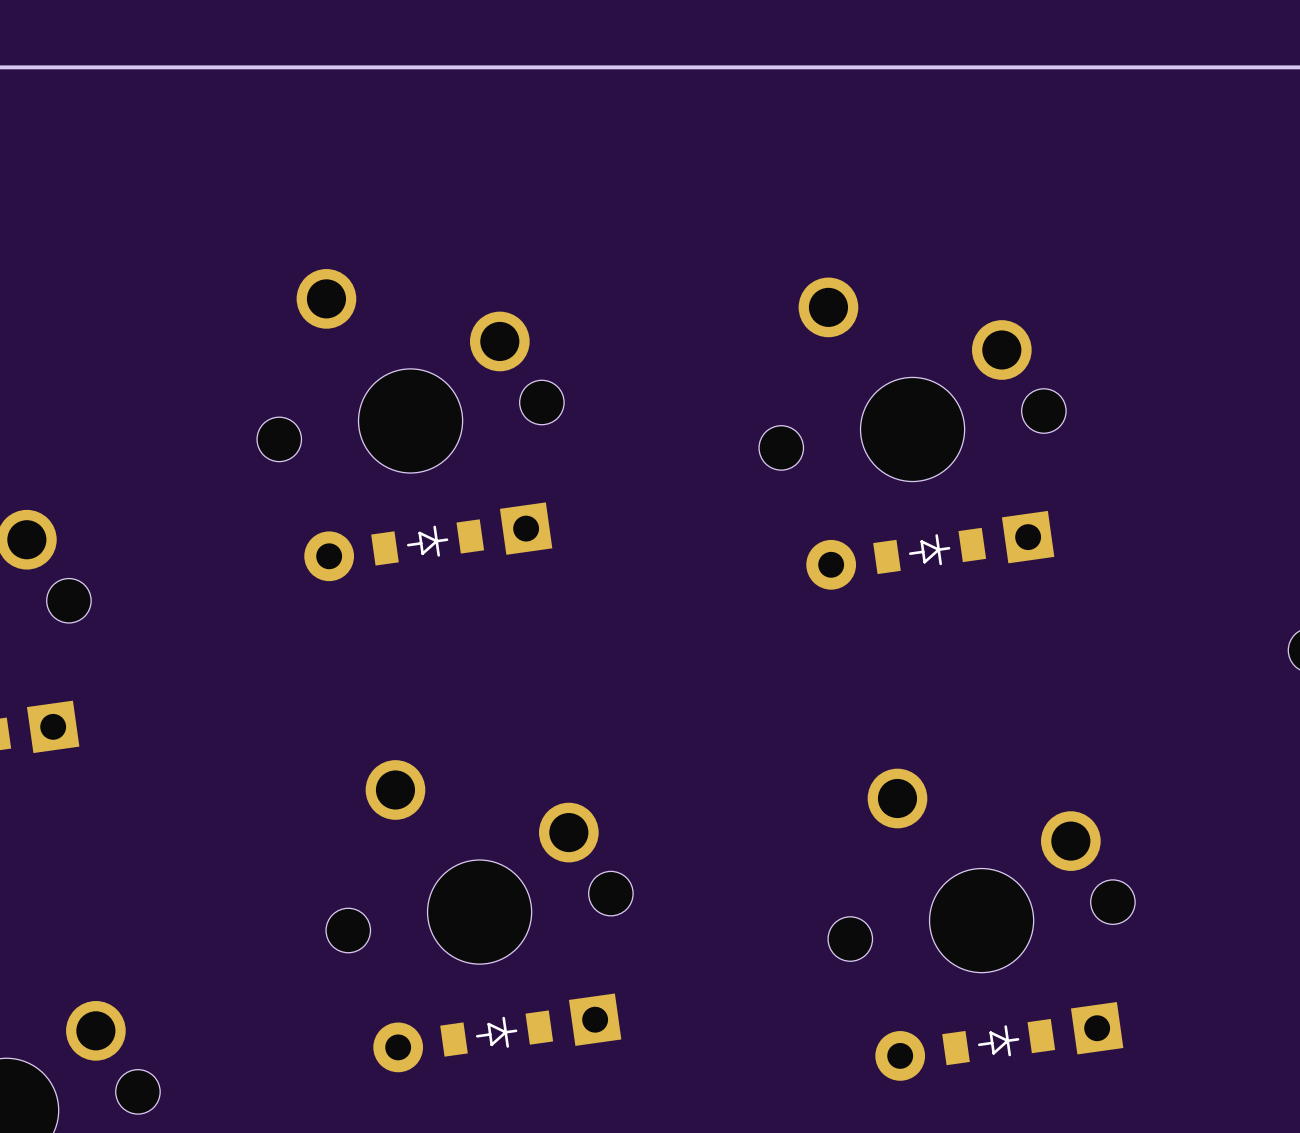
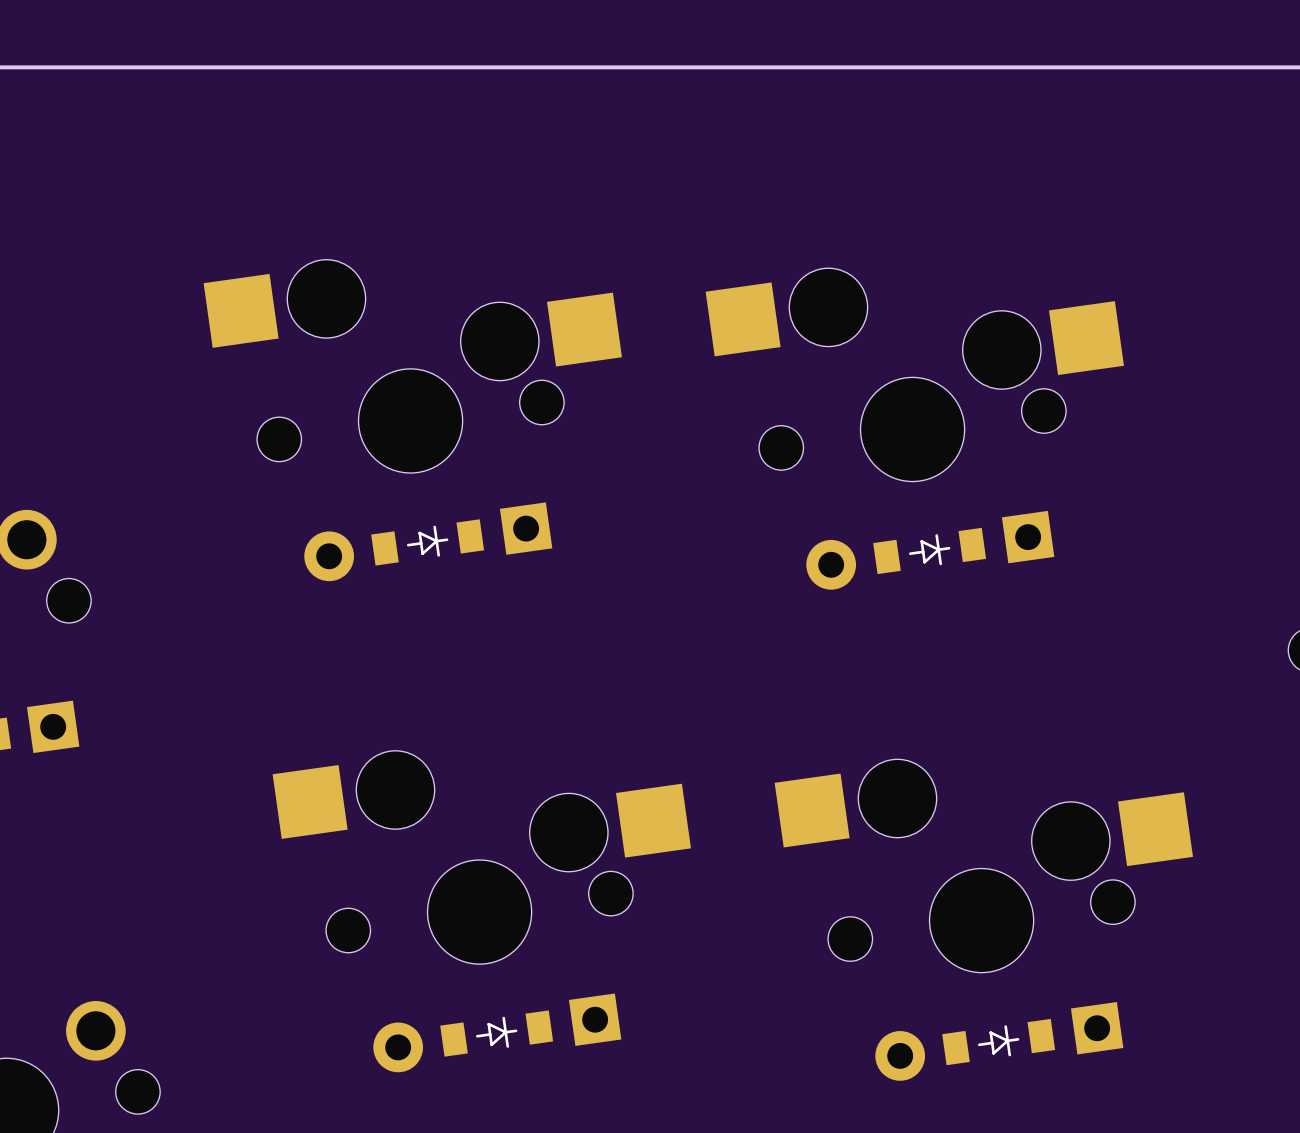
part footprint: [257, 269, 565, 474] -> [203, 259, 622, 474]
part footprint: [759, 277, 1067, 482] -> [705, 268, 1124, 482]
part footprint: [326, 760, 634, 965] -> [272, 750, 691, 965]
part footprint: [828, 768, 1136, 973] -> [774, 759, 1193, 973]

